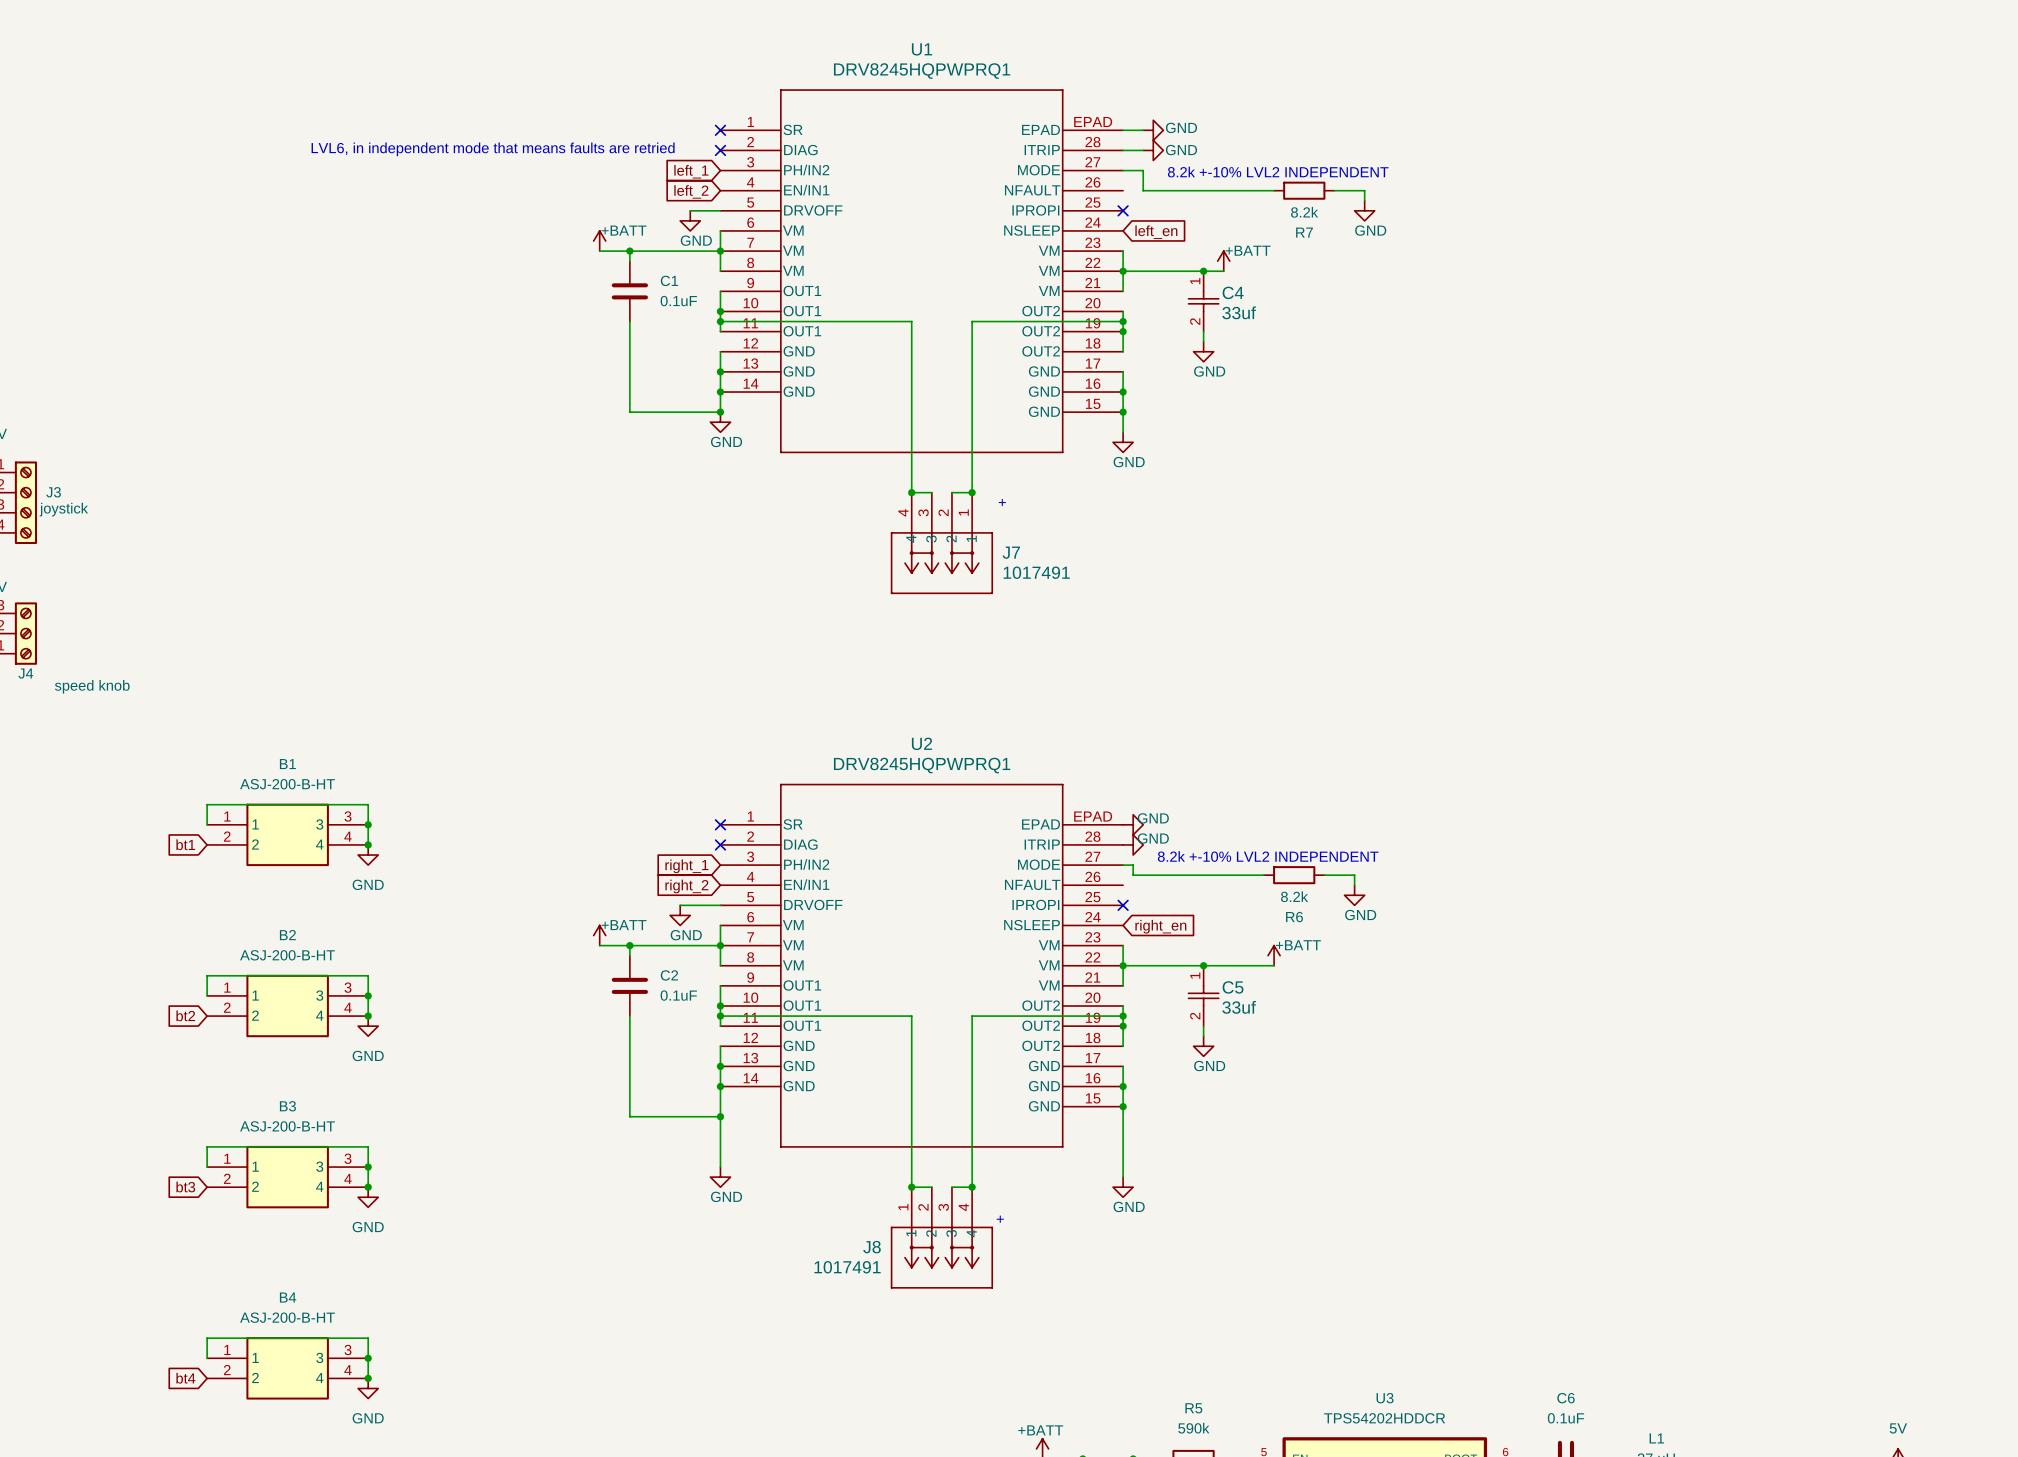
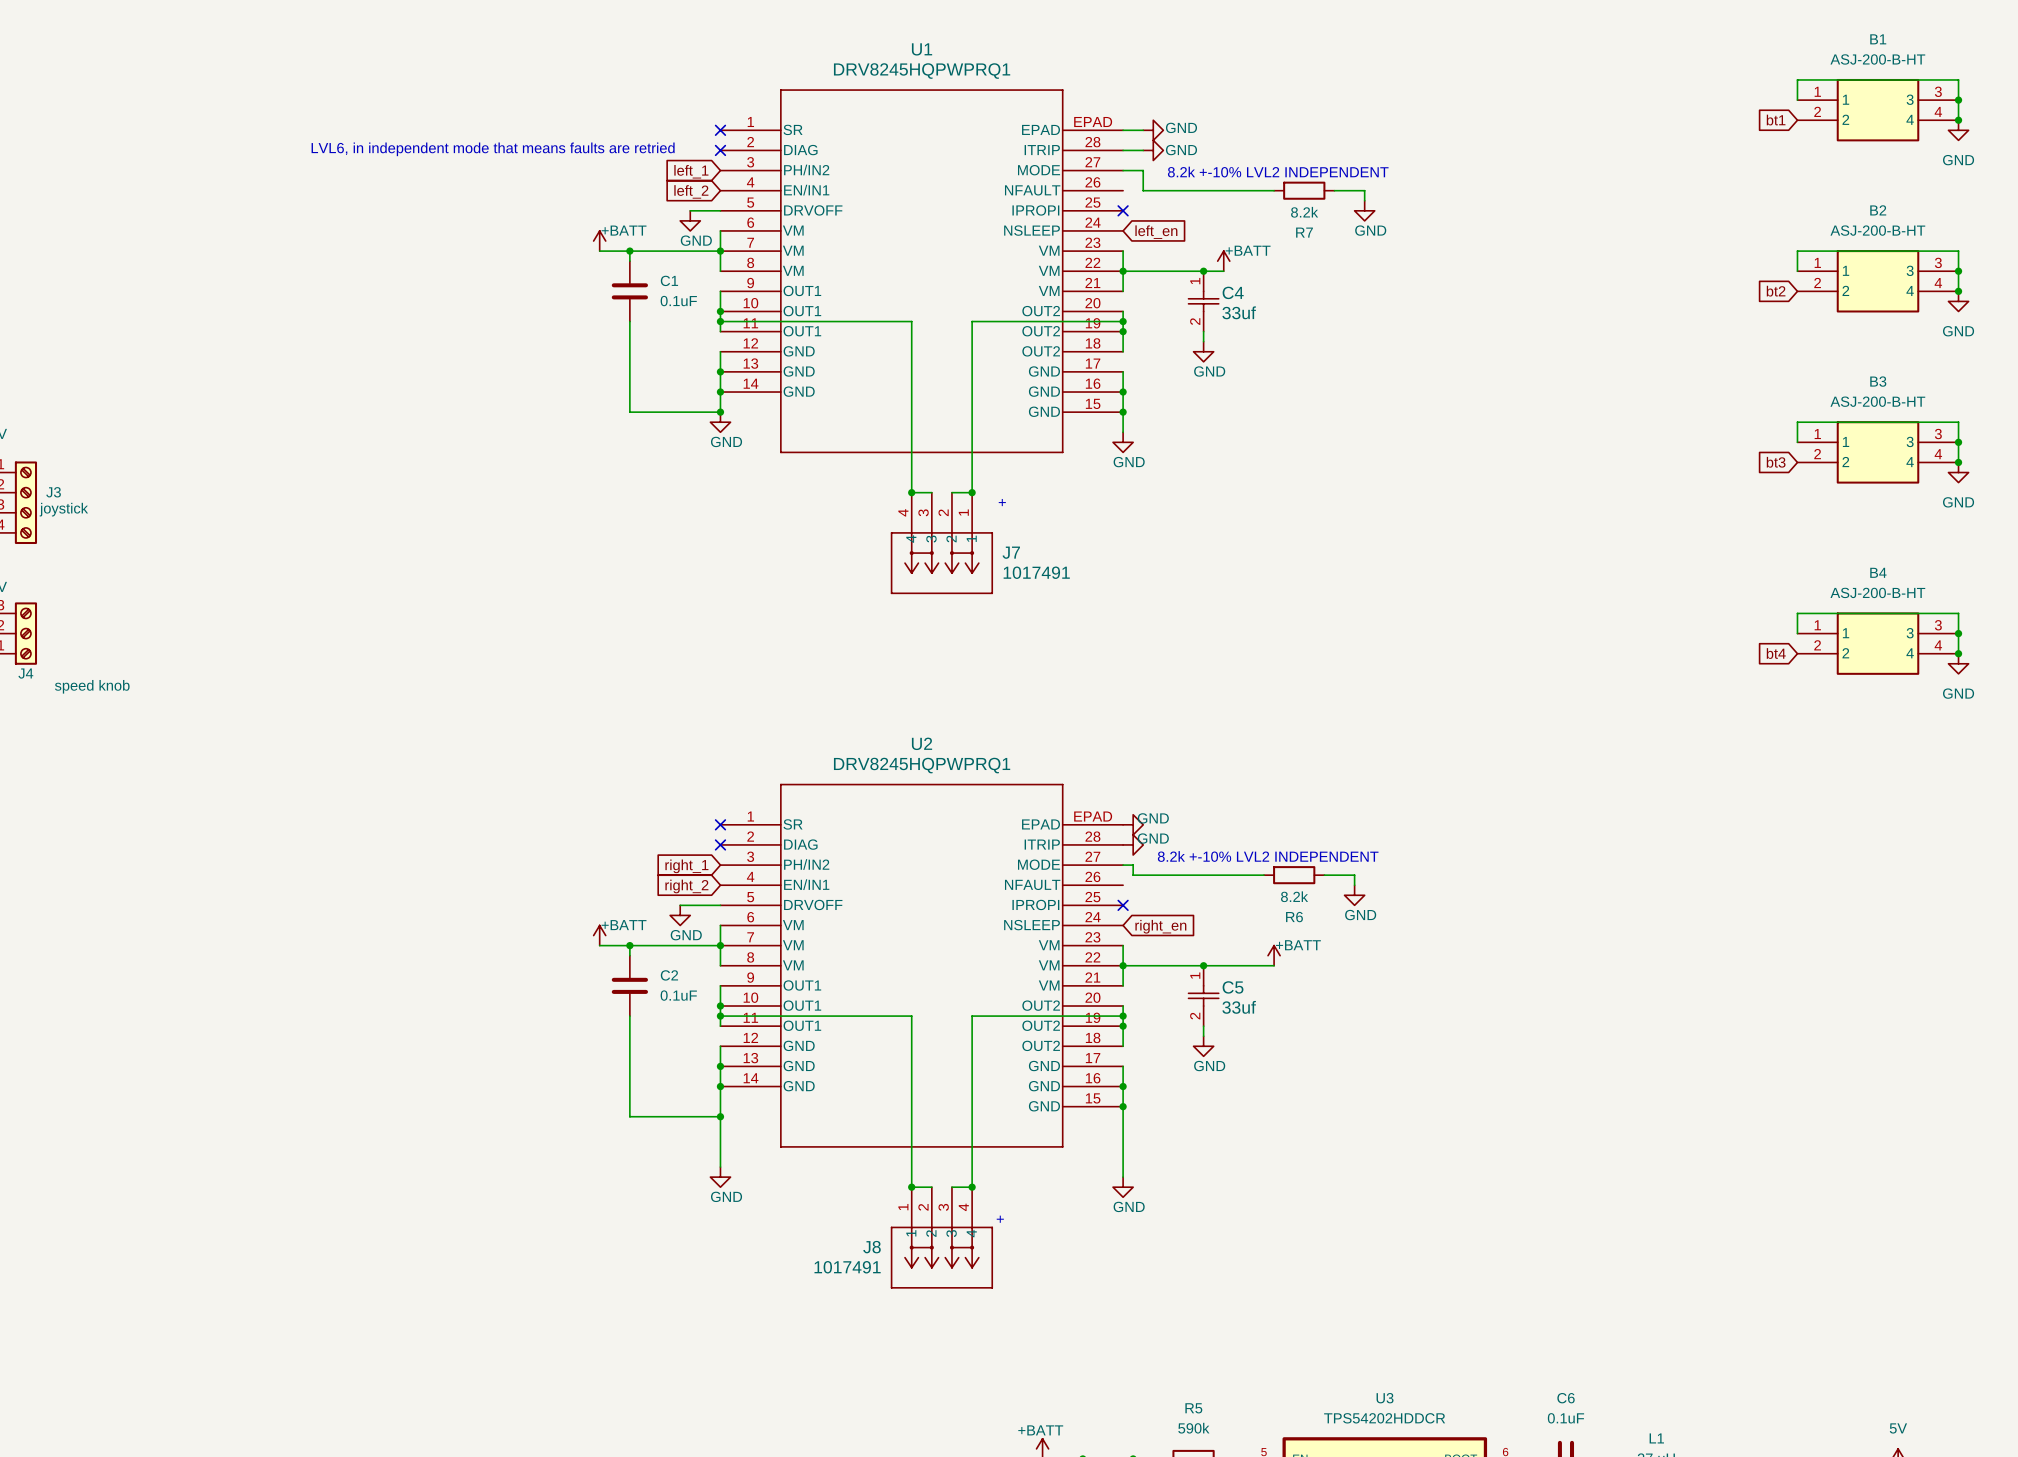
wire: none -> (1797, 100) (1797, 79) (1958, 79) (1958, 120)
junction: none -> (1958, 100)
global label: none -> bt1 (1776, 120)
junction: none -> (1958, 120)
power symbol: none -> GND (1958, 130)
wire: none -> (1797, 271) (1797, 251) (1958, 251) (1958, 291)
junction: none -> (1958, 271)
global label: none -> bt2 (1776, 291)
junction: none -> (1958, 291)
power symbol: none -> GND (1958, 301)
wire: none -> (1797, 442) (1797, 422) (1958, 422) (1958, 462)
junction: none -> (1958, 442)
global label: none -> bt3 (1776, 462)
junction: none -> (1958, 462)
power symbol: none -> GND (1958, 472)
wire: none -> (1797, 633) (1797, 613) (1958, 613) (1958, 653)
junction: none -> (1958, 633)
global label: none -> bt4 (1776, 653)
junction: none -> (1958, 653)
power symbol: none -> GND (1958, 663)
wire: (207, 824) (207, 804) (368, 804) (368, 844) -> none
junction: (368, 824) -> none
B1 position: (287, 834) -> (1878, 110)
global label: bt1 (185, 844) -> none
junction: (368, 844) -> none
power symbol: GND (368, 855) -> none
wire: (207, 995) (207, 975) (368, 975) (368, 1016) -> none
junction: (368, 995) -> none
B2 position: (287, 1006) -> (1878, 281)
global label: bt2 (185, 1015) -> none
junction: (368, 1016) -> none
power symbol: GND (368, 1026) -> none
wire: (207, 1167) (207, 1146) (368, 1146) (368, 1187) -> none
junction: (368, 1167) -> none
B3 position: (287, 1177) -> (1878, 452)
global label: bt3 (185, 1186) -> none
junction: (368, 1187) -> none
power symbol: GND (368, 1197) -> none
wire: (207, 1358) (207, 1338) (368, 1338) (368, 1378) -> none
junction: (368, 1358) -> none
B4 position: (287, 1368) -> (1878, 643)
global label: bt4 (185, 1378) -> none
junction: (368, 1378) -> none
power symbol: GND (368, 1388) -> none

